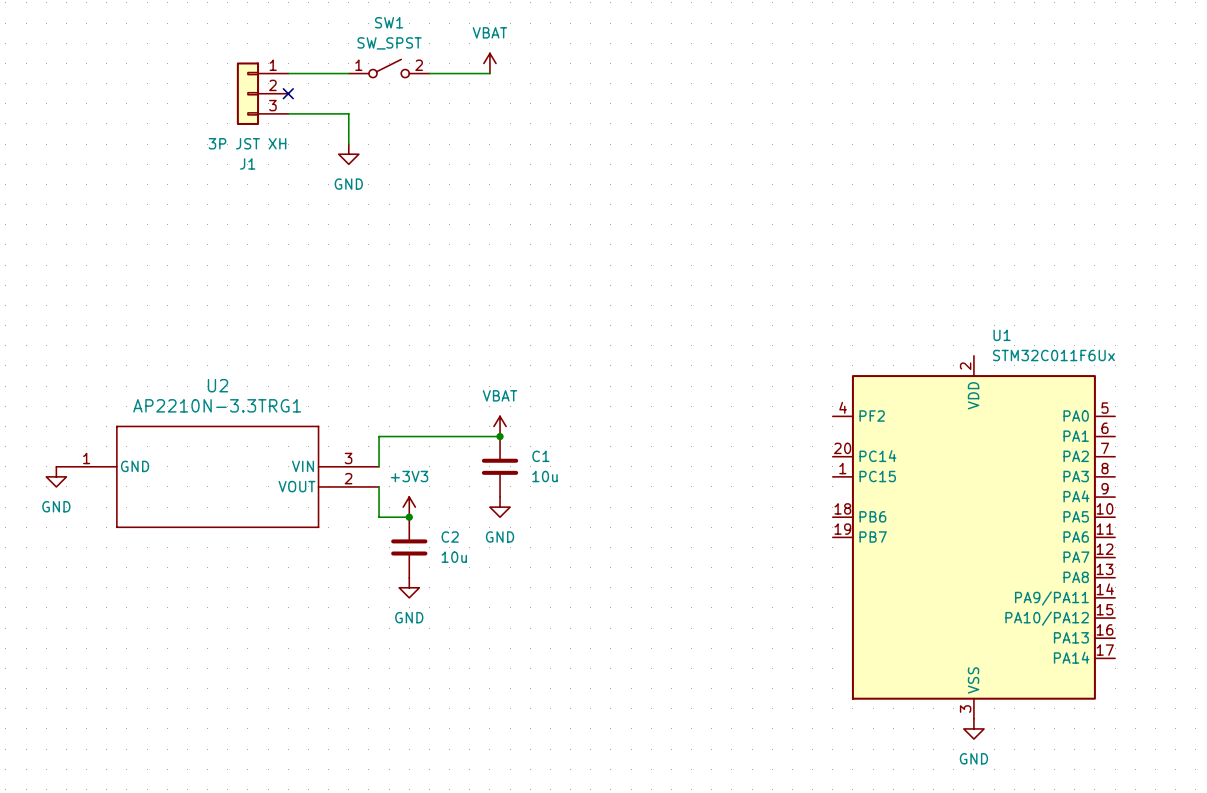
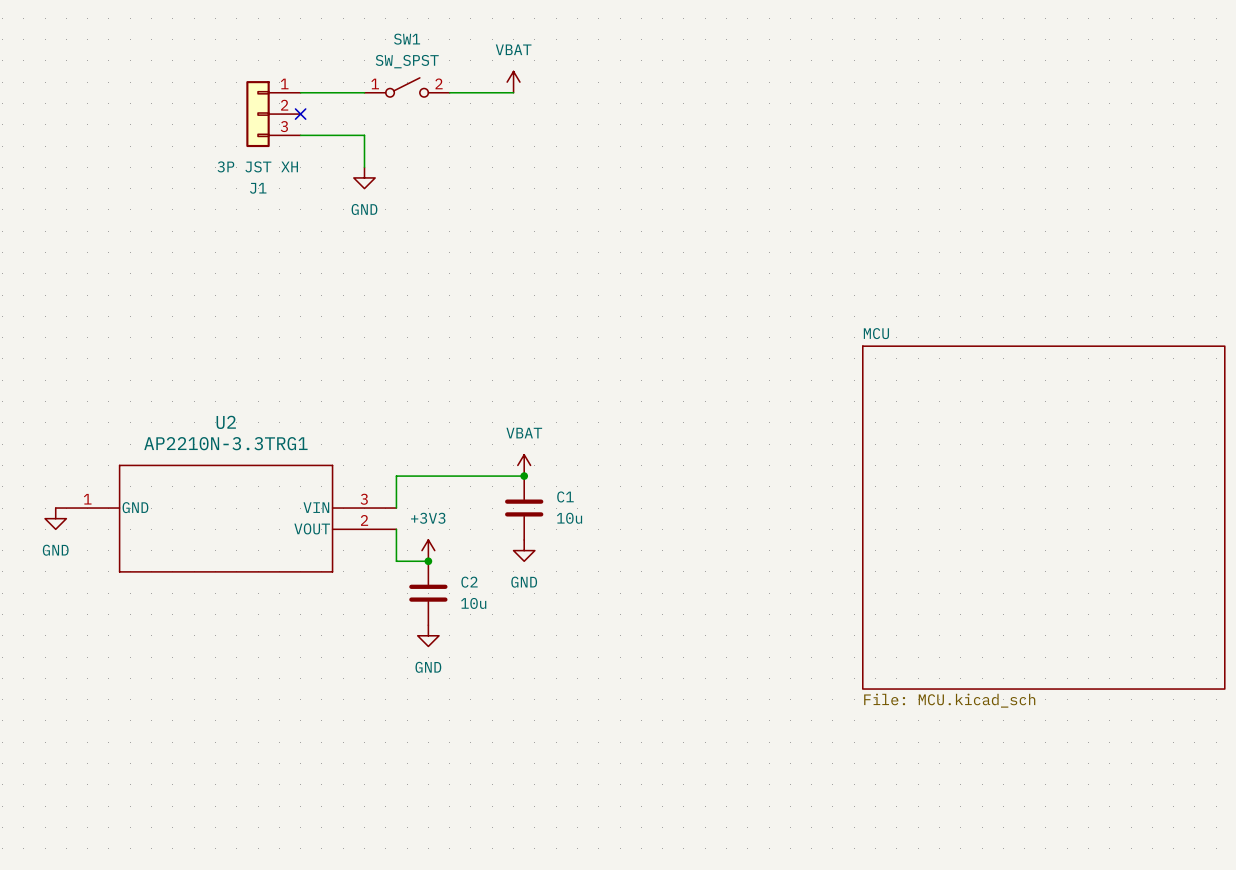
sheet MCU: none -> File: MCU.kicad_sch (1043, 517)
U1: STM32C011F6Ux (973, 537) -> none
power symbol: GND (973, 728) -> none

